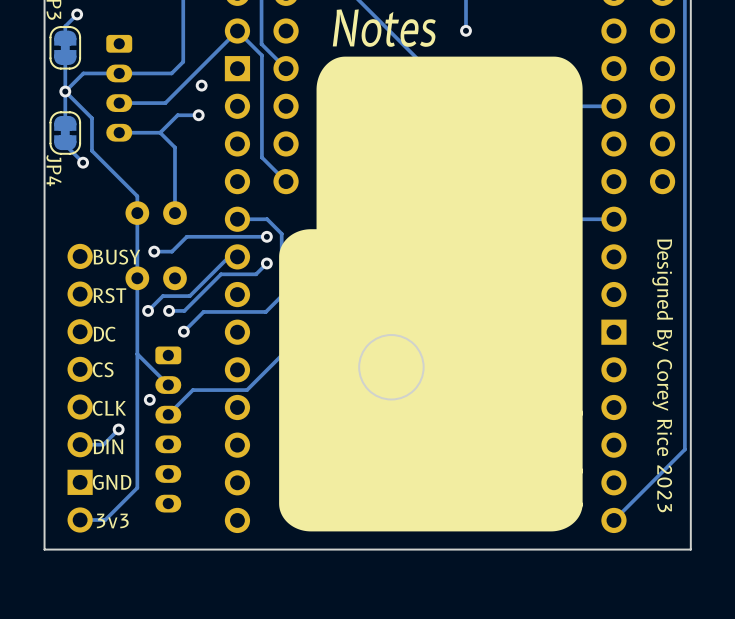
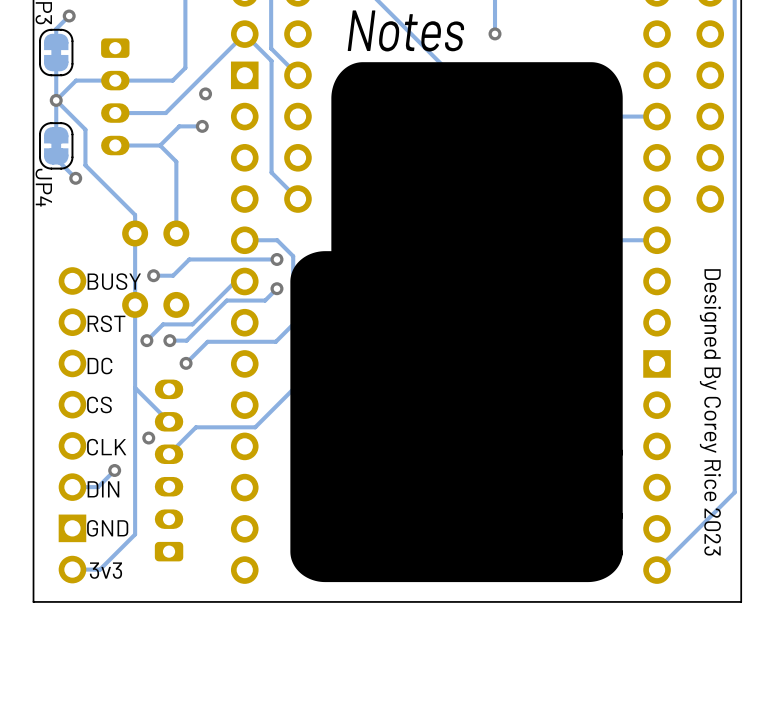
part rotation: 0° (168, 429) -> 180° (169, 470)

